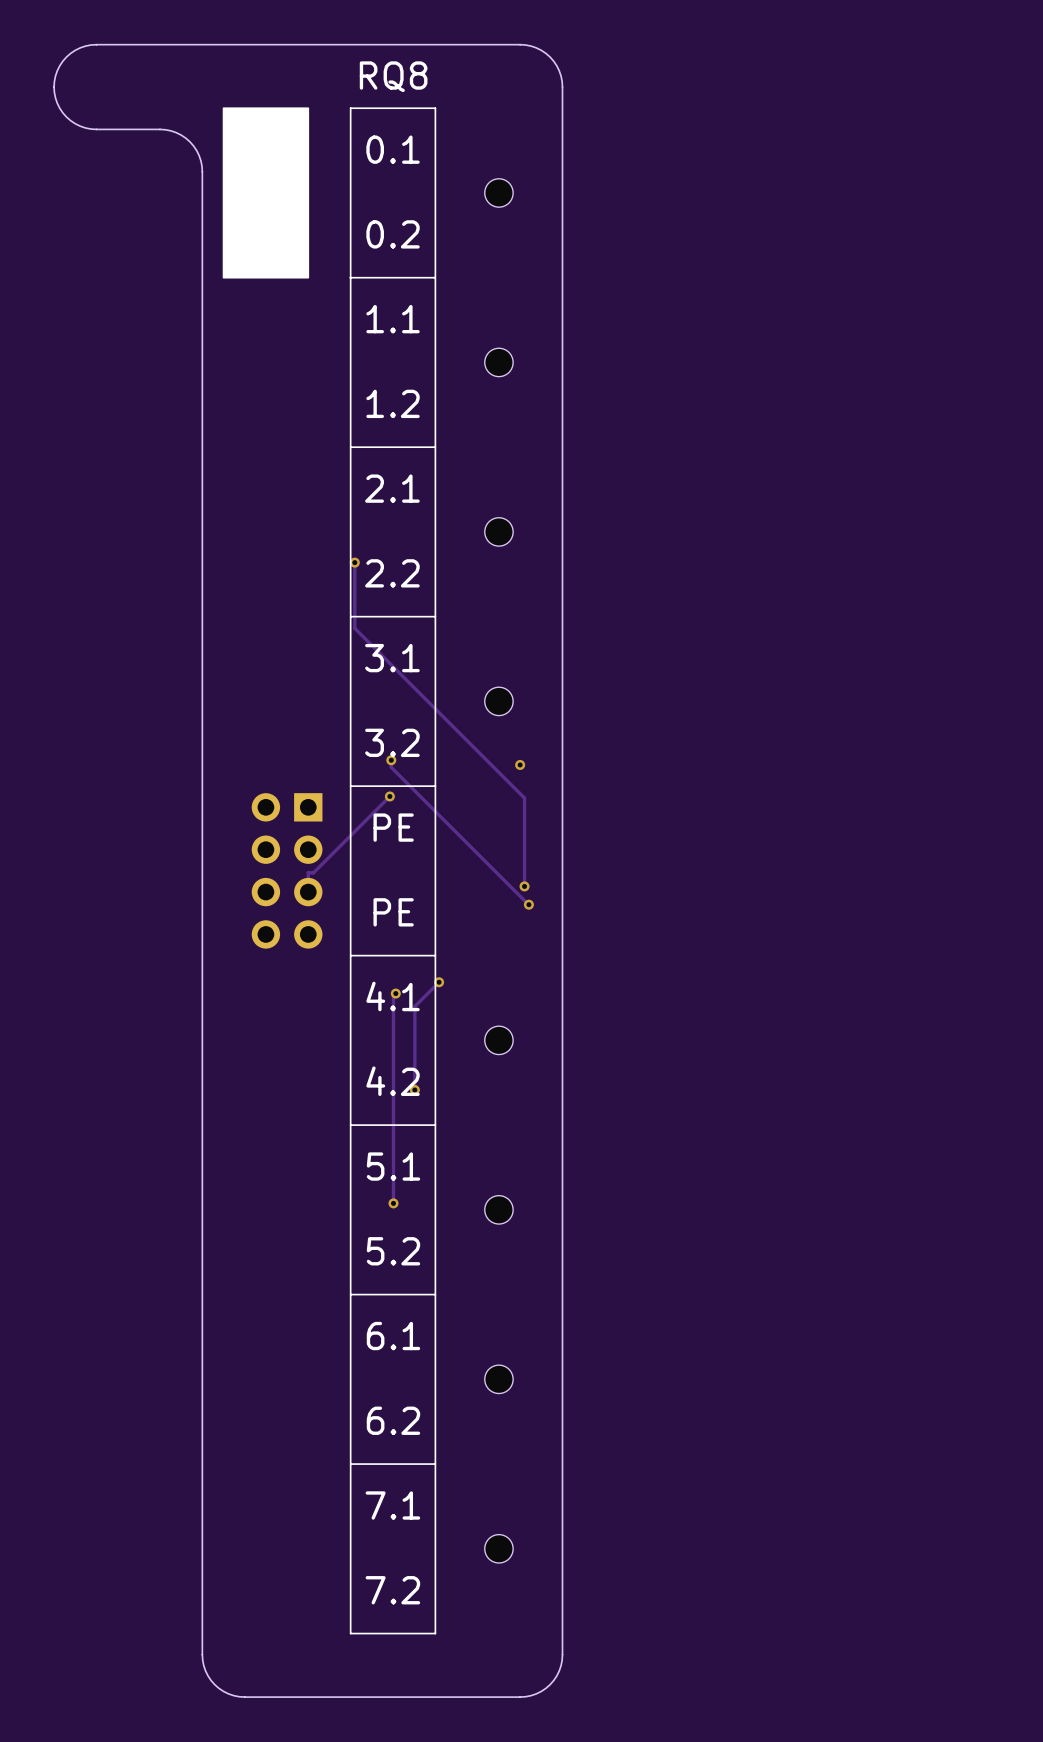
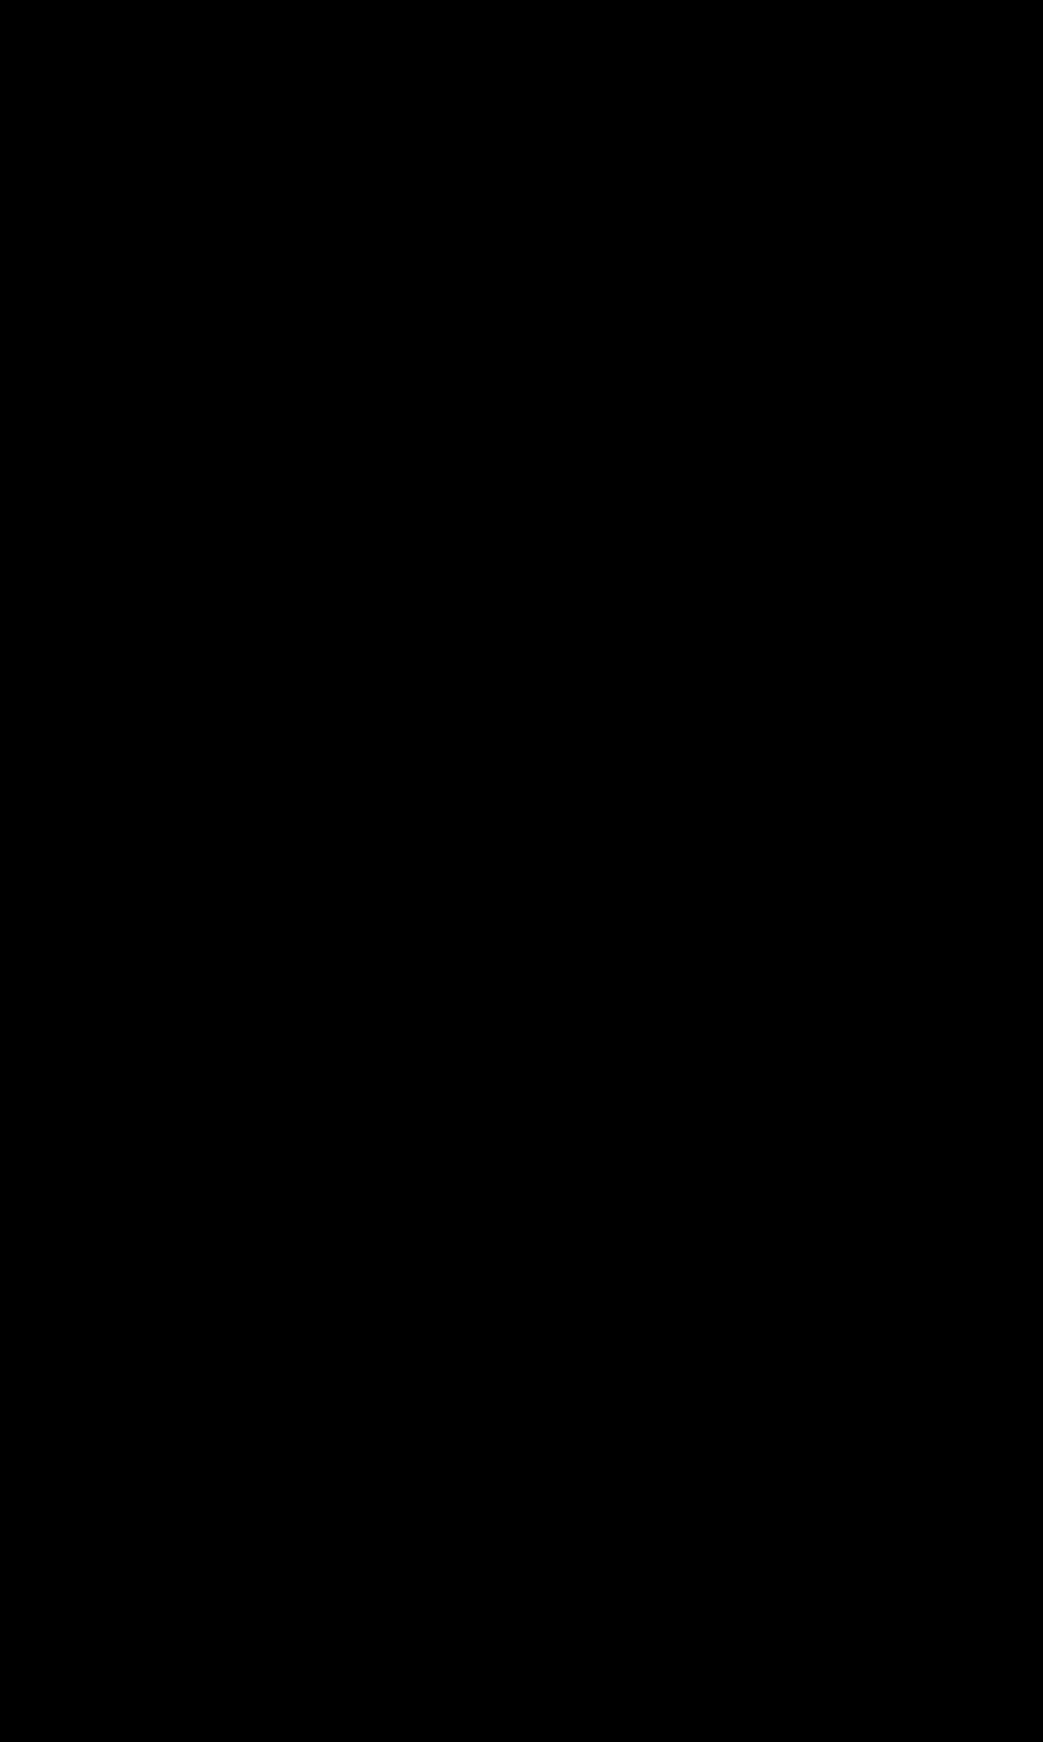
board edge: (96, 44) (525, 45) (545, 53) (553, 61) (561, 76) (562, 1654) (559, 1670) (553, 1680) (545, 1688) (531, 1695) (239, 1696) (218, 1688) (211, 1680) (203, 1665) (202, 166) (193, 145) (176, 132) (159, 129) (90, 129) (75, 123) (62, 112) (54, 92) (57, 70) (66, 57) (75, 50) (96, 44) -> none
text: RQ8 (393, 76) -> none
drawing: [222, 107, 310, 279] -> none
line: (350, 108) (435, 108) (435, 1633) (350, 1633) (350, 108) -> none
text: 0.1 (393, 149) -> none
part: (498, 192) -> none
text: 0.2 (393, 234) -> none
line: (350, 277) (434, 277) -> none
text: 1.1 (393, 319) -> none
part: (498, 362) -> none
text: 1.2 (393, 403) -> none
line: (350, 447) (435, 447) -> none
text: 2.1 (392, 488) -> none
part: (498, 531) -> none
track: (354, 562) (354, 628) (524, 798) (524, 886) -> none
via: (354, 562) -> none
text: 2.2 (392, 573) -> none
line: (350, 616) (435, 616) -> none
text: 3.1 (392, 658) -> none
part: (498, 701) -> none
text: 3.2 (392, 742) -> none
track: (391, 760) (391, 767) (528, 904) -> none
via: (391, 760) -> none
via: (520, 764) -> none
line: (350, 786) (435, 786) -> none
track: (389, 796) (313, 872) (308, 872) (308, 892) -> none
via: (389, 796) -> none
text: PE (393, 827) -> none
part: (287, 870) -> none
via: (524, 886) -> none
via: (528, 904) -> none
text: PE (393, 912) -> none
line: (350, 955) (435, 955) -> none
track: (439, 982) (414, 1006) (414, 1090) -> none
via: (439, 982) -> none
track: (395, 993) (393, 995) (393, 1203) -> none
via: (395, 993) -> none
text: 4.1 (393, 996) -> none
part: (498, 1040) -> none
text: 4.2 (393, 1081) -> none
via: (414, 1090) -> none
line: (350, 1125) (435, 1125) -> none
text: 5.1 (393, 1166) -> none
via: (393, 1203) -> none
part: (498, 1209) -> none
text: 5.2 (393, 1251) -> none
line: (350, 1294) (435, 1294) -> none
text: 6.1 (393, 1336) -> none
part: (498, 1379) -> none
text: 6.2 (393, 1420) -> none
line: (350, 1464) (435, 1464) -> none
text: 7.1 (392, 1505) -> none
part: (498, 1548) -> none
text: 7.2 (392, 1590) -> none

